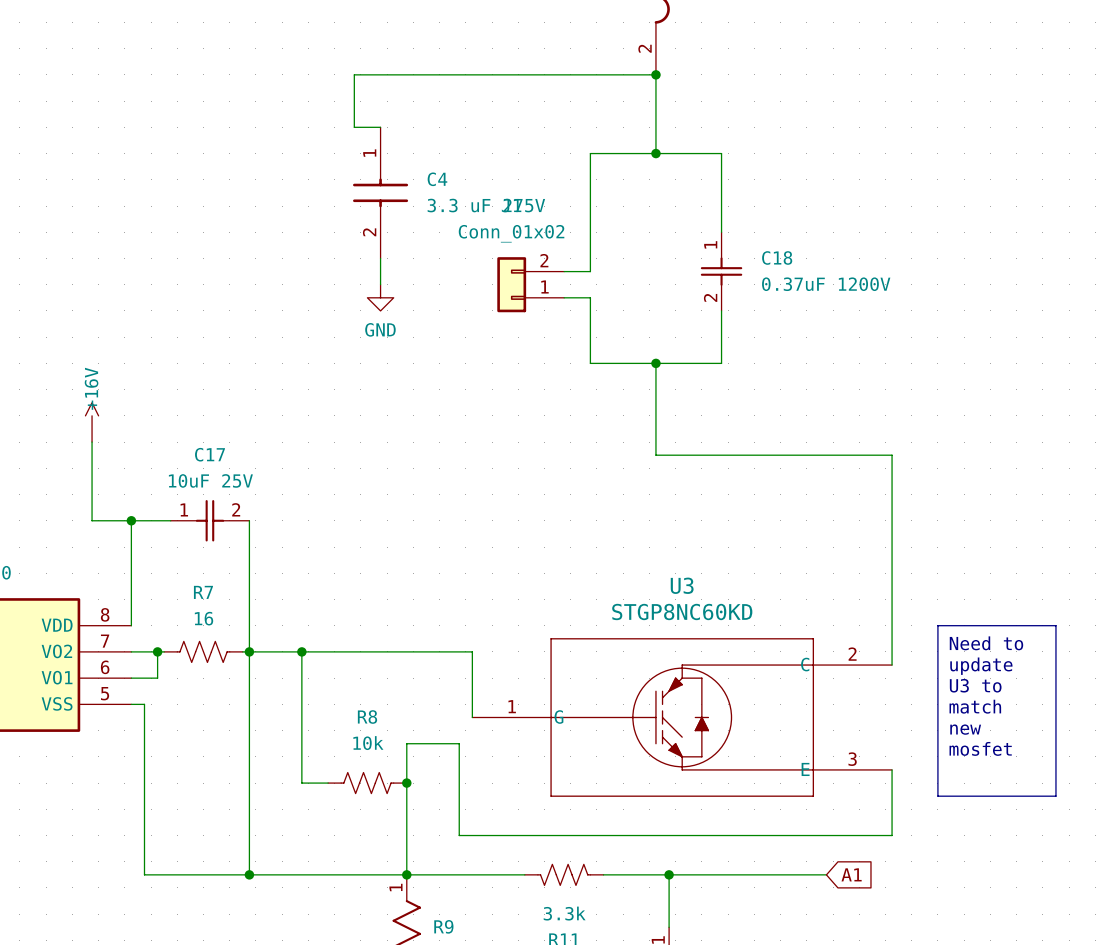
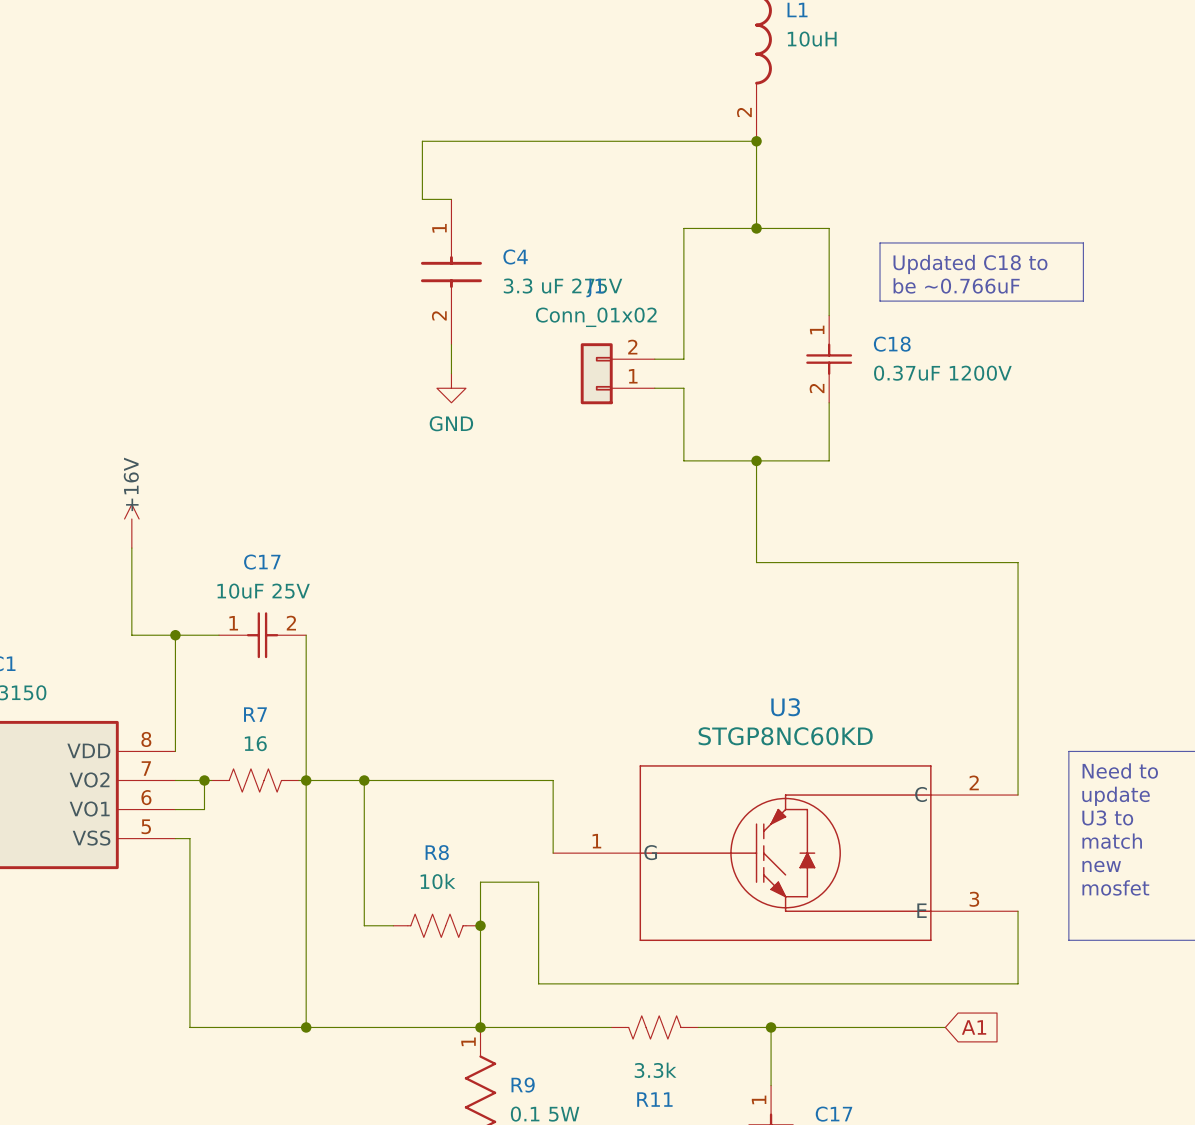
line: none -> (880, 242) (1083, 242) (1083, 301) (880, 301) (880, 242)
text: none -> Updated C18 to (970, 264)
text: none -> be ~0.766uF (956, 285)

